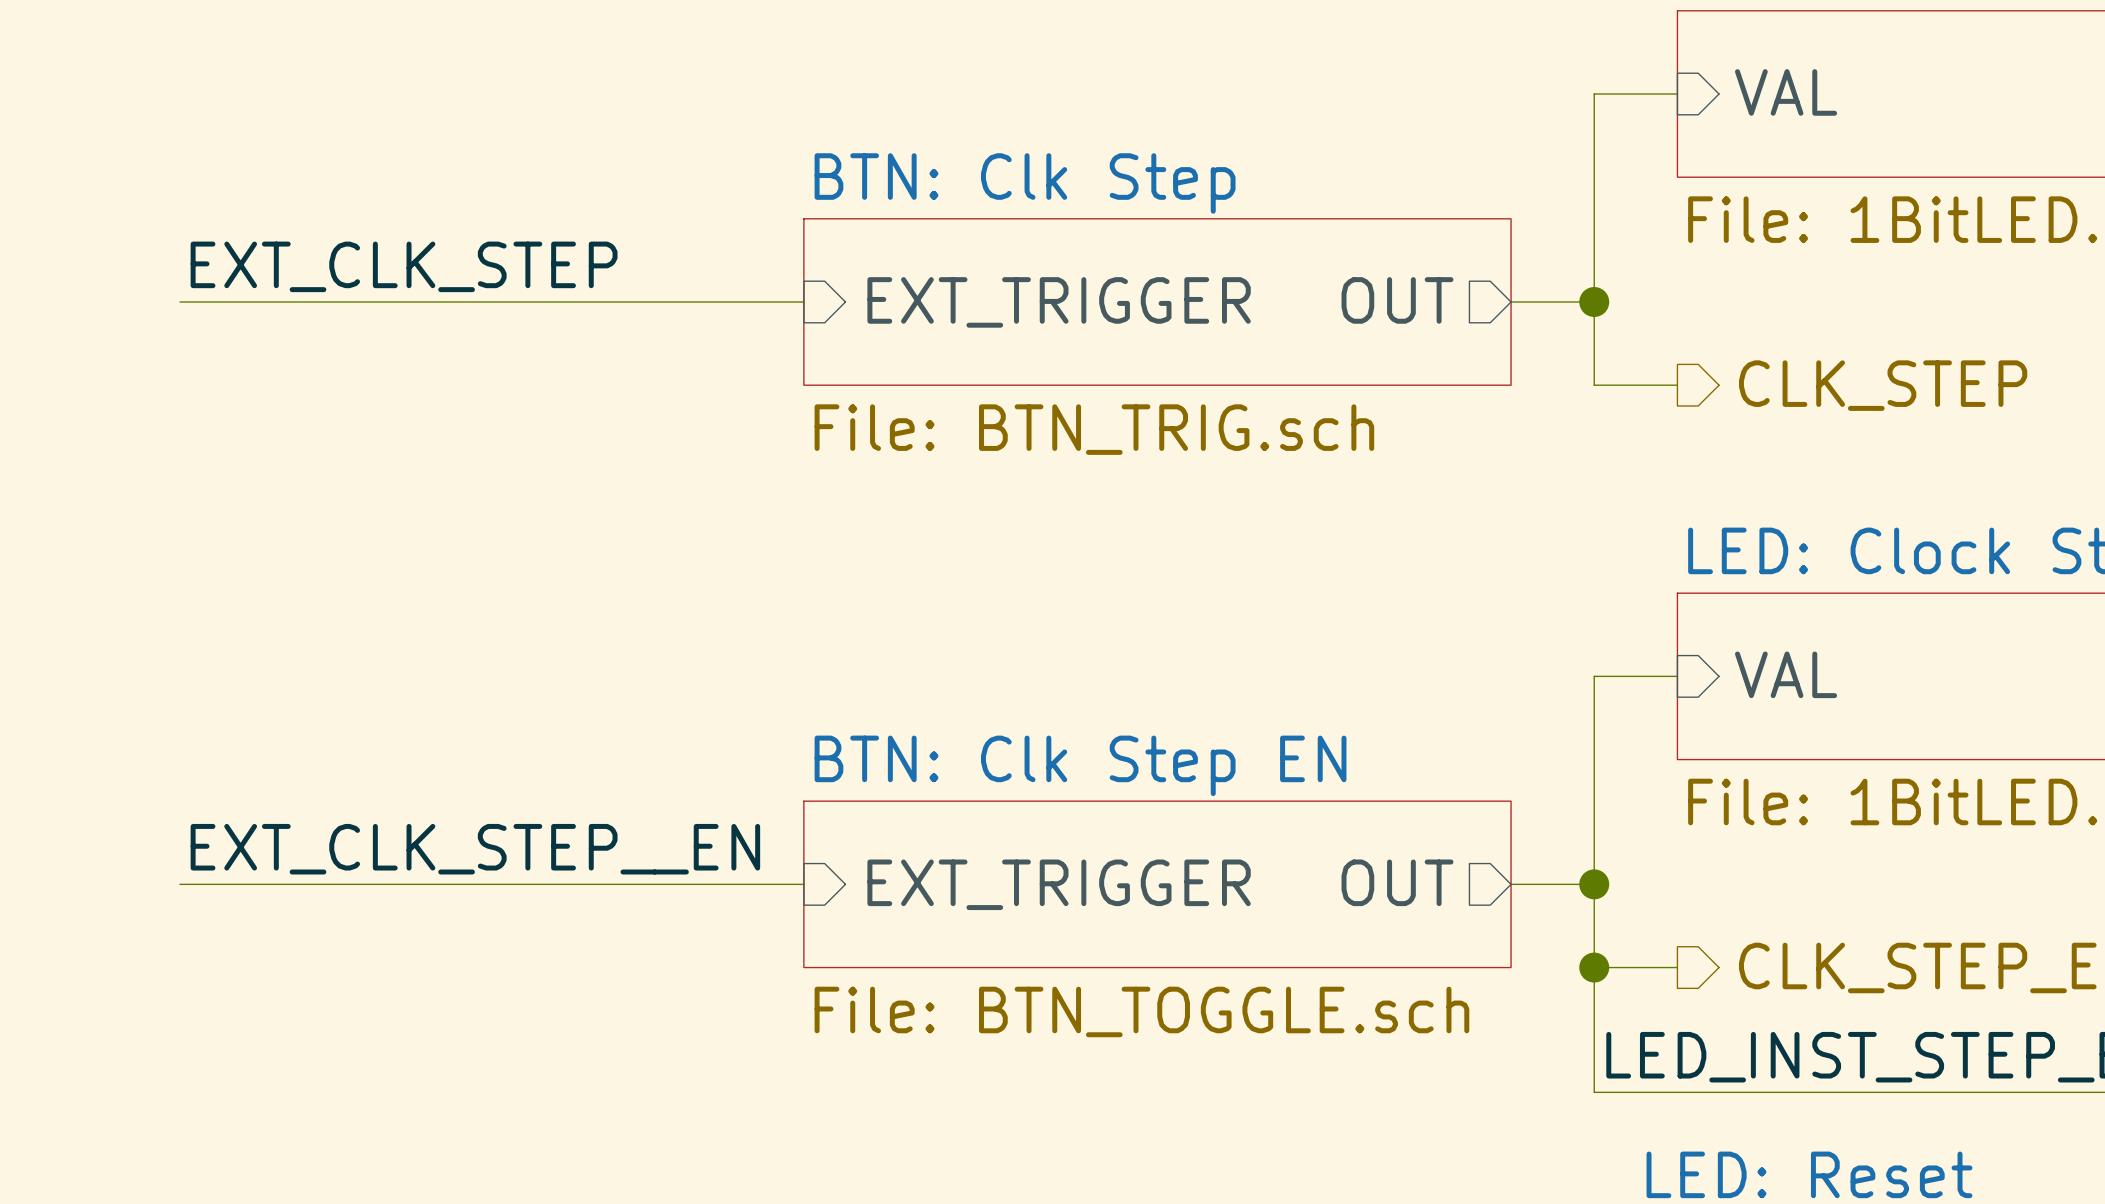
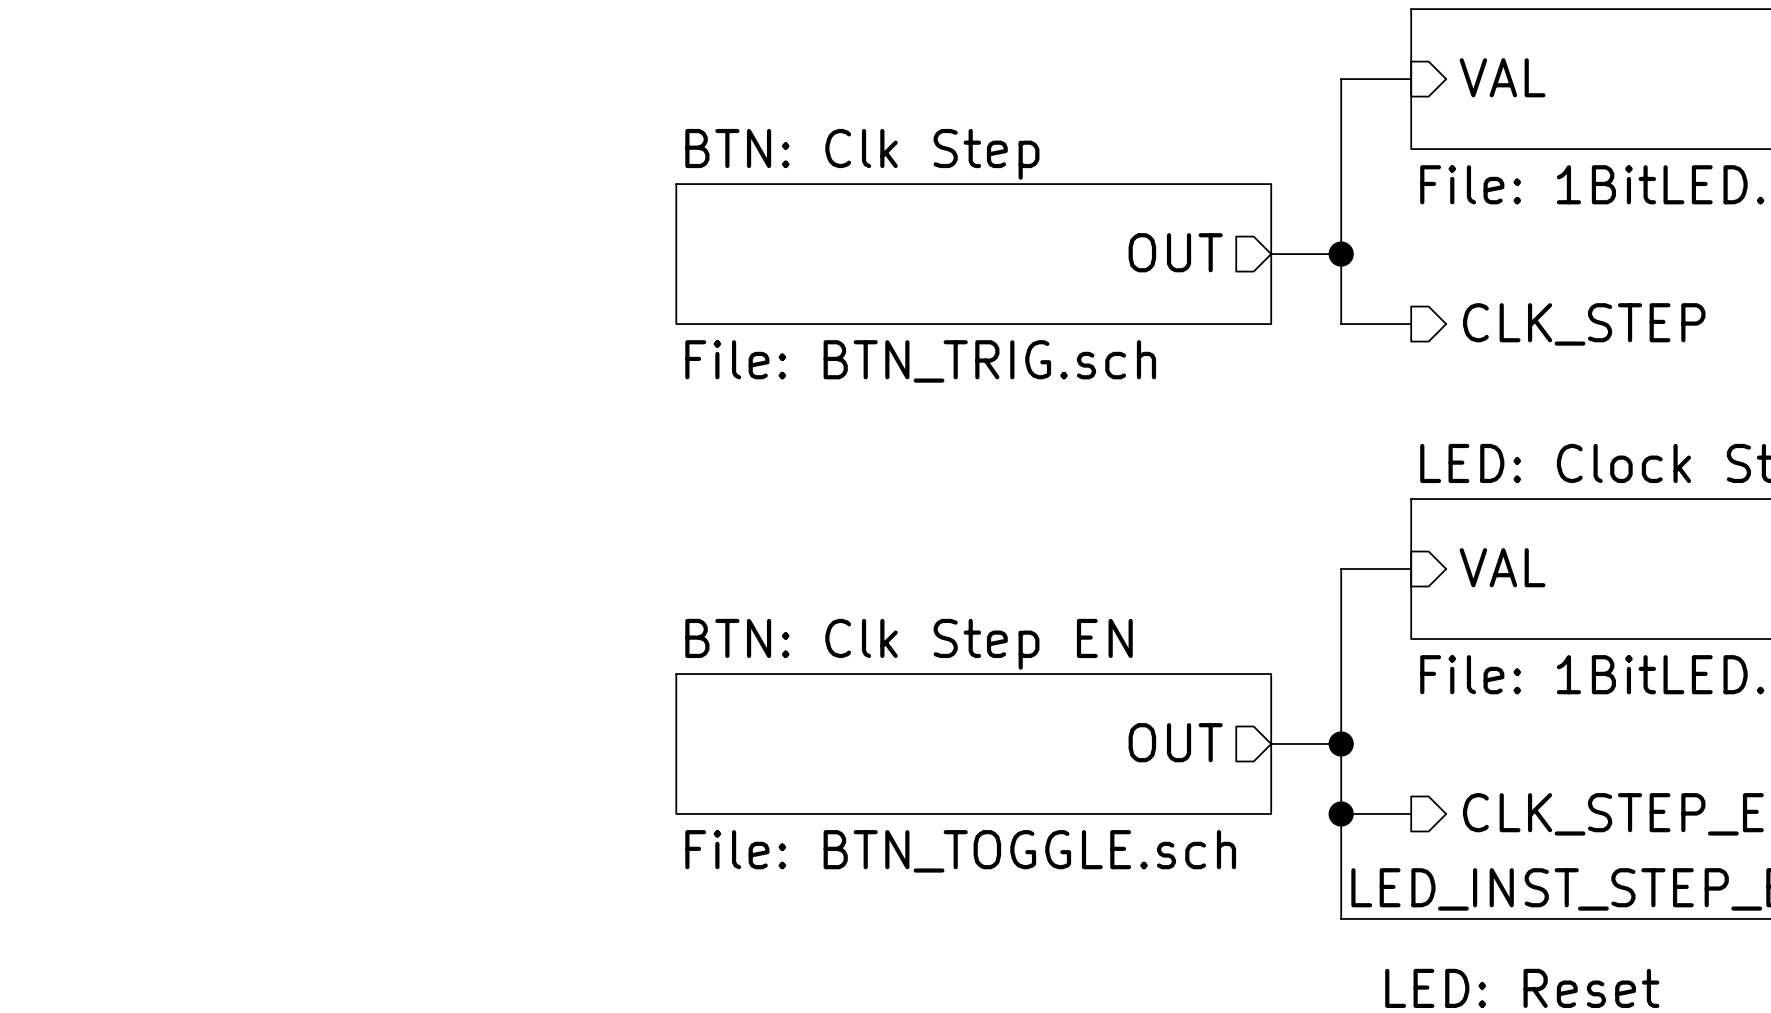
label: EXT_CLK_STEP (404, 266) -> none
wire: (179, 301) (803, 301) -> none
sheet pin: EXT_TRIGGER (1059, 302) -> none
label: EXT_CLK_STEP__EN (475, 849) -> none
wire: (179, 884) (803, 884) -> none
sheet pin: EXT_TRIGGER (1059, 884) -> none

